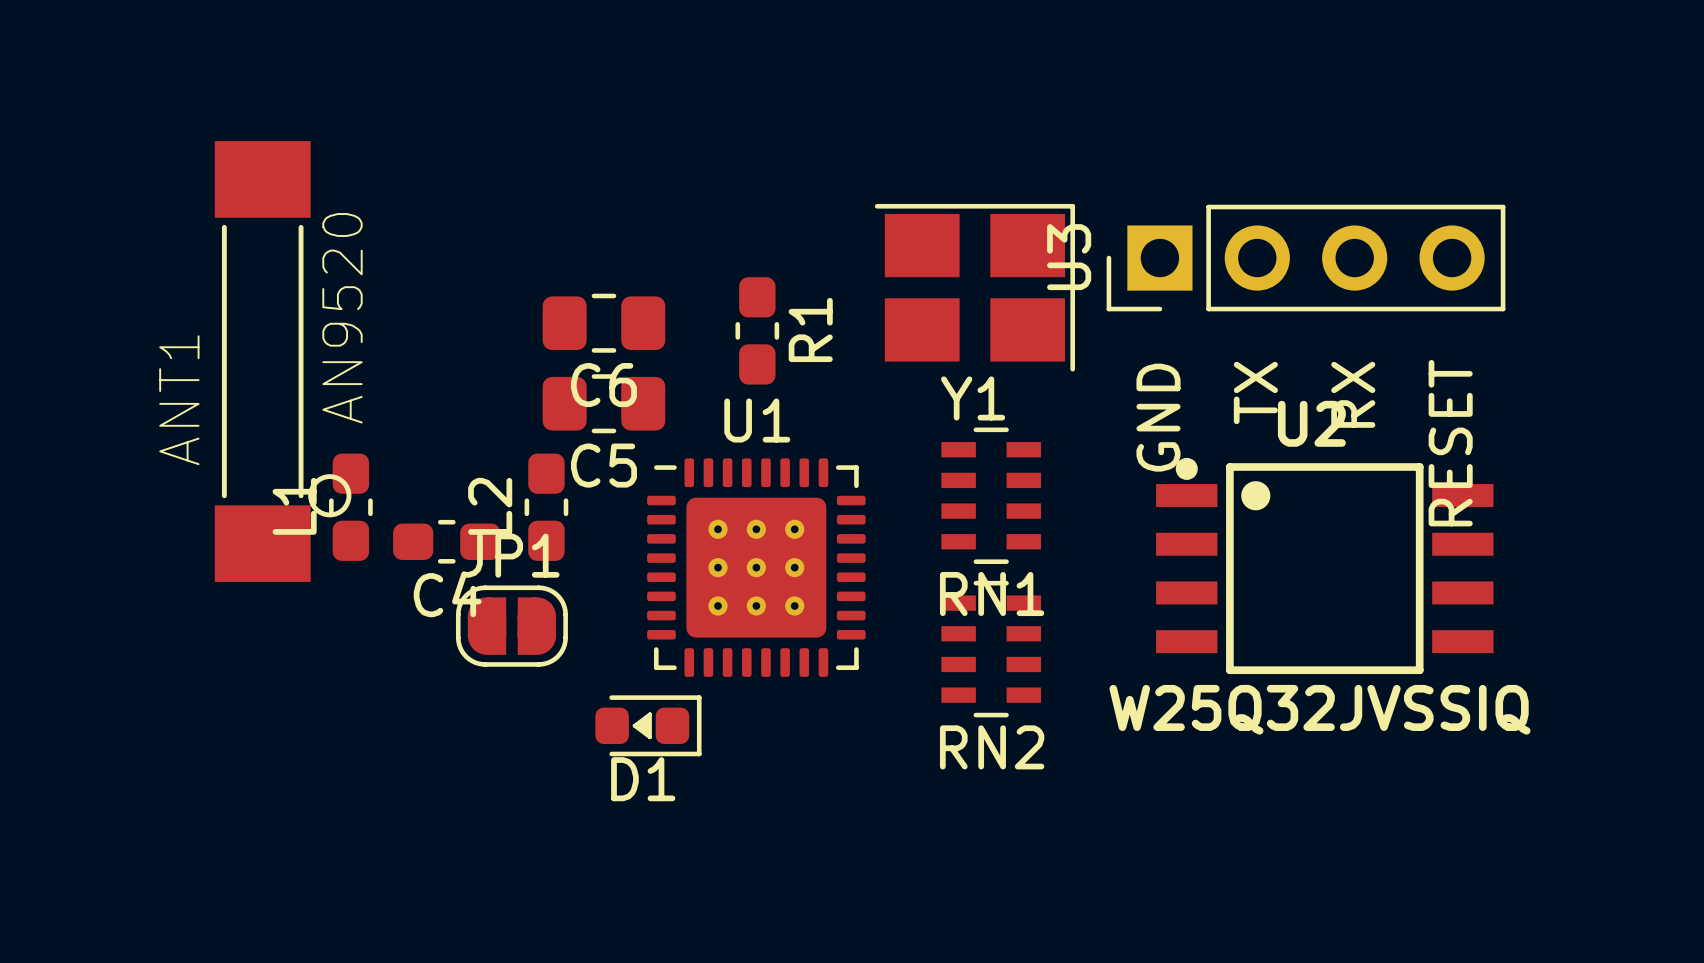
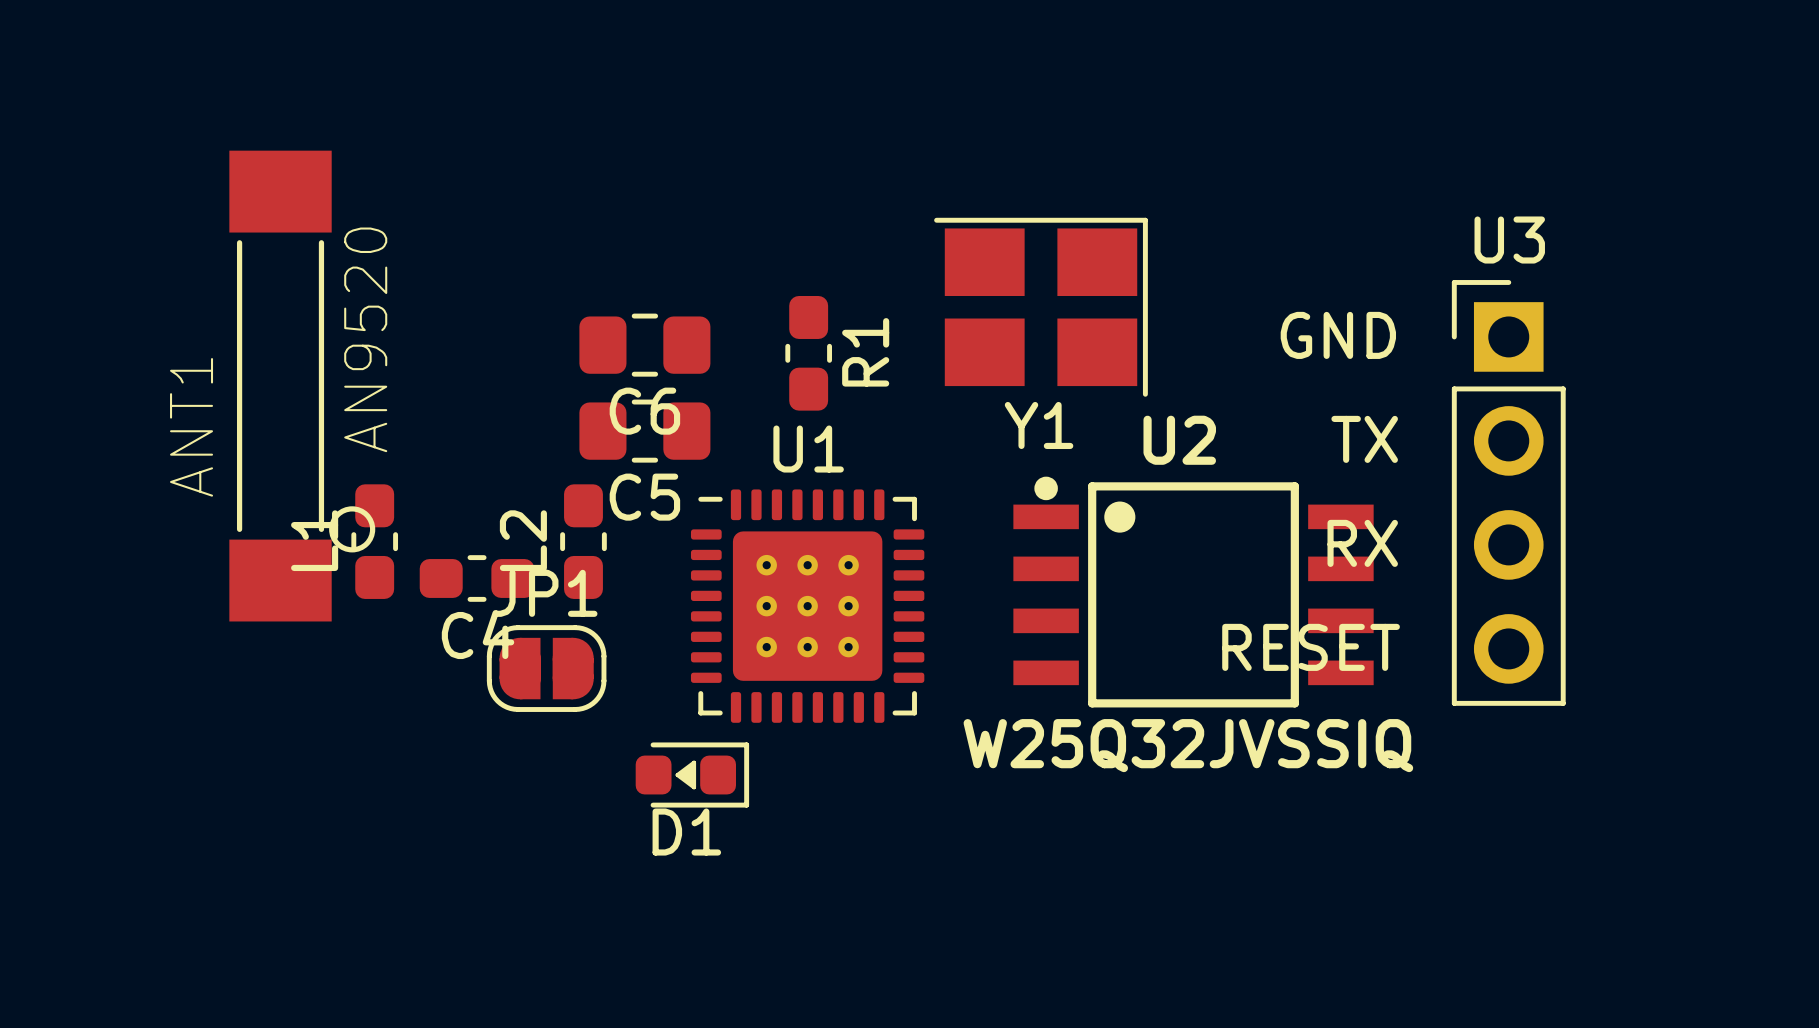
U3 rotation: 0° (1306, 258) -> 90° clockwise (1508, 492)
RN1: (991, 495) -> none
U2 position: (1324, 565) -> (1193, 592)
RN2: (991, 649) -> none

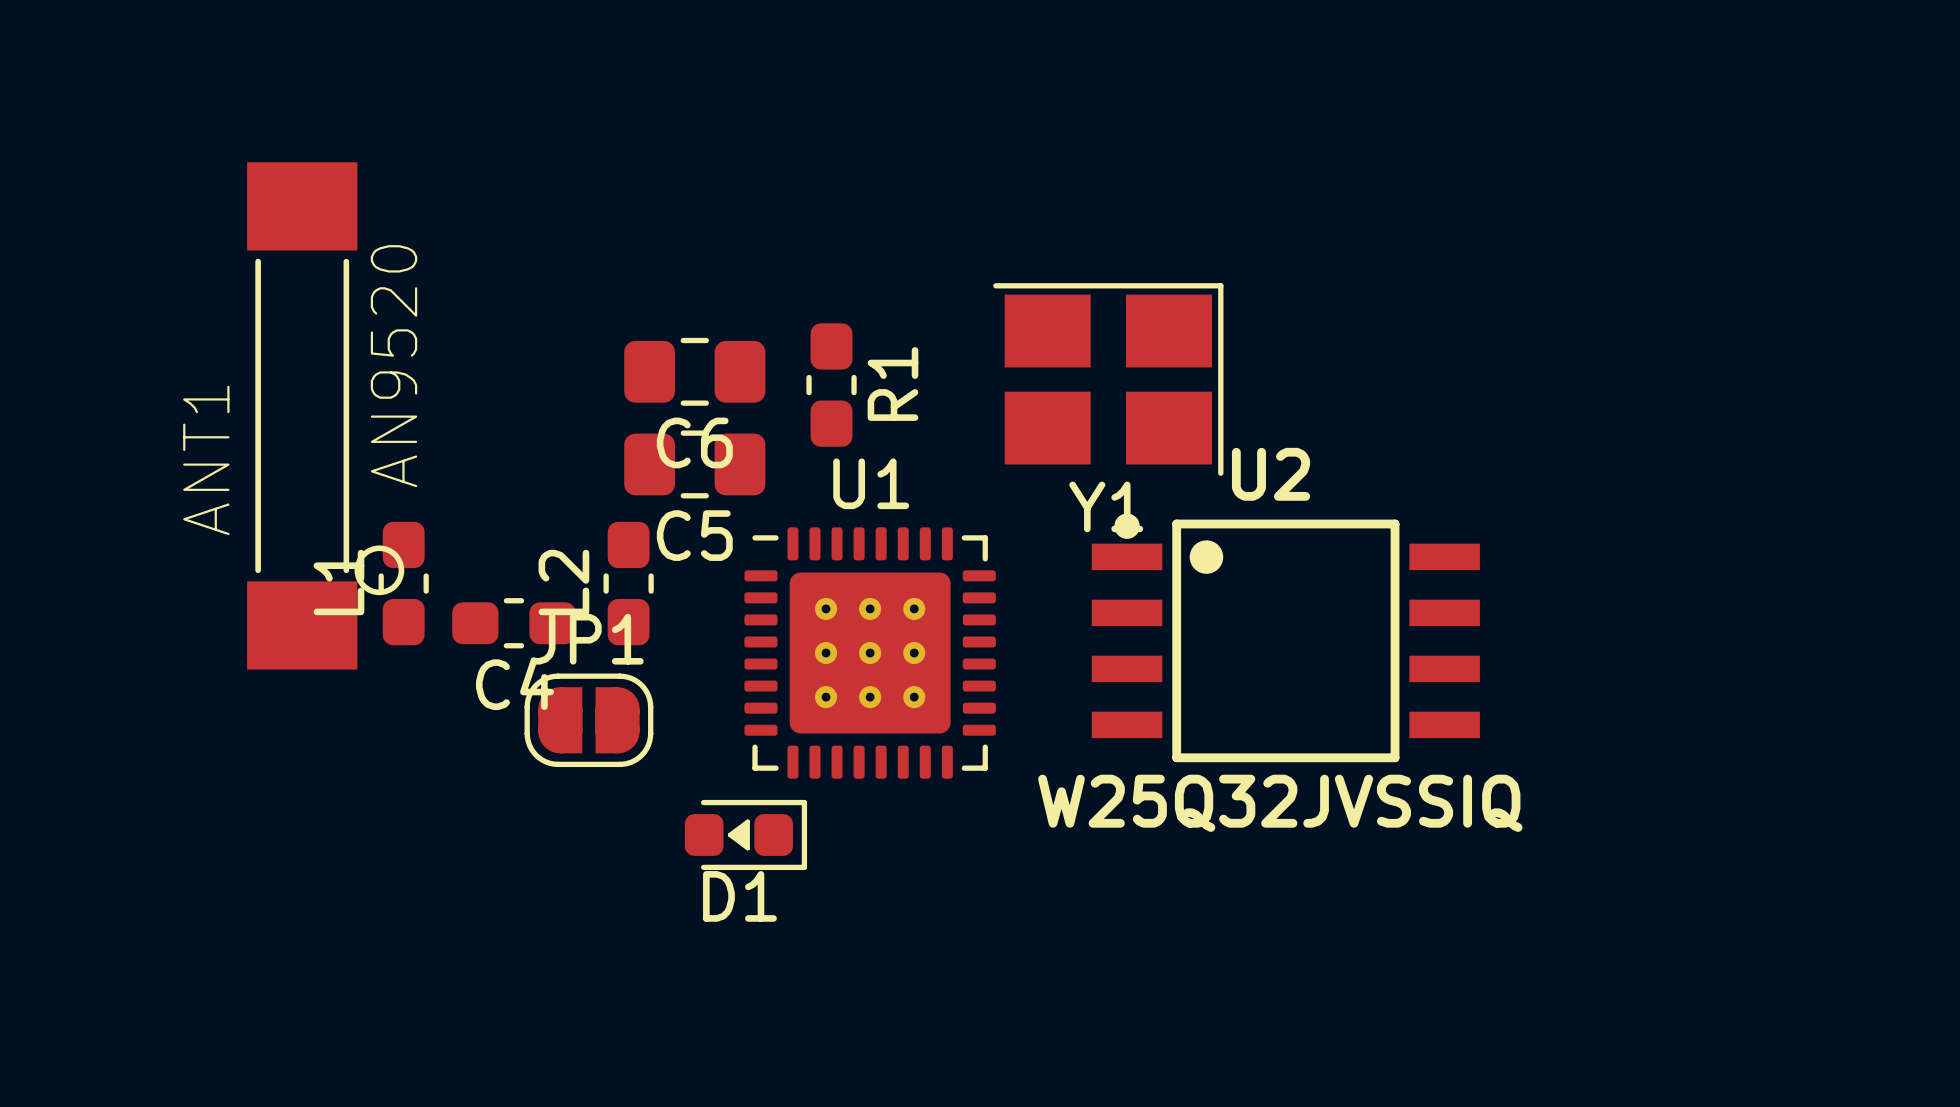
Y1 position: (1041, 307) -> (1108, 379)
R1 position: (808, 353) -> (831, 385)
U3: (1508, 492) -> none

